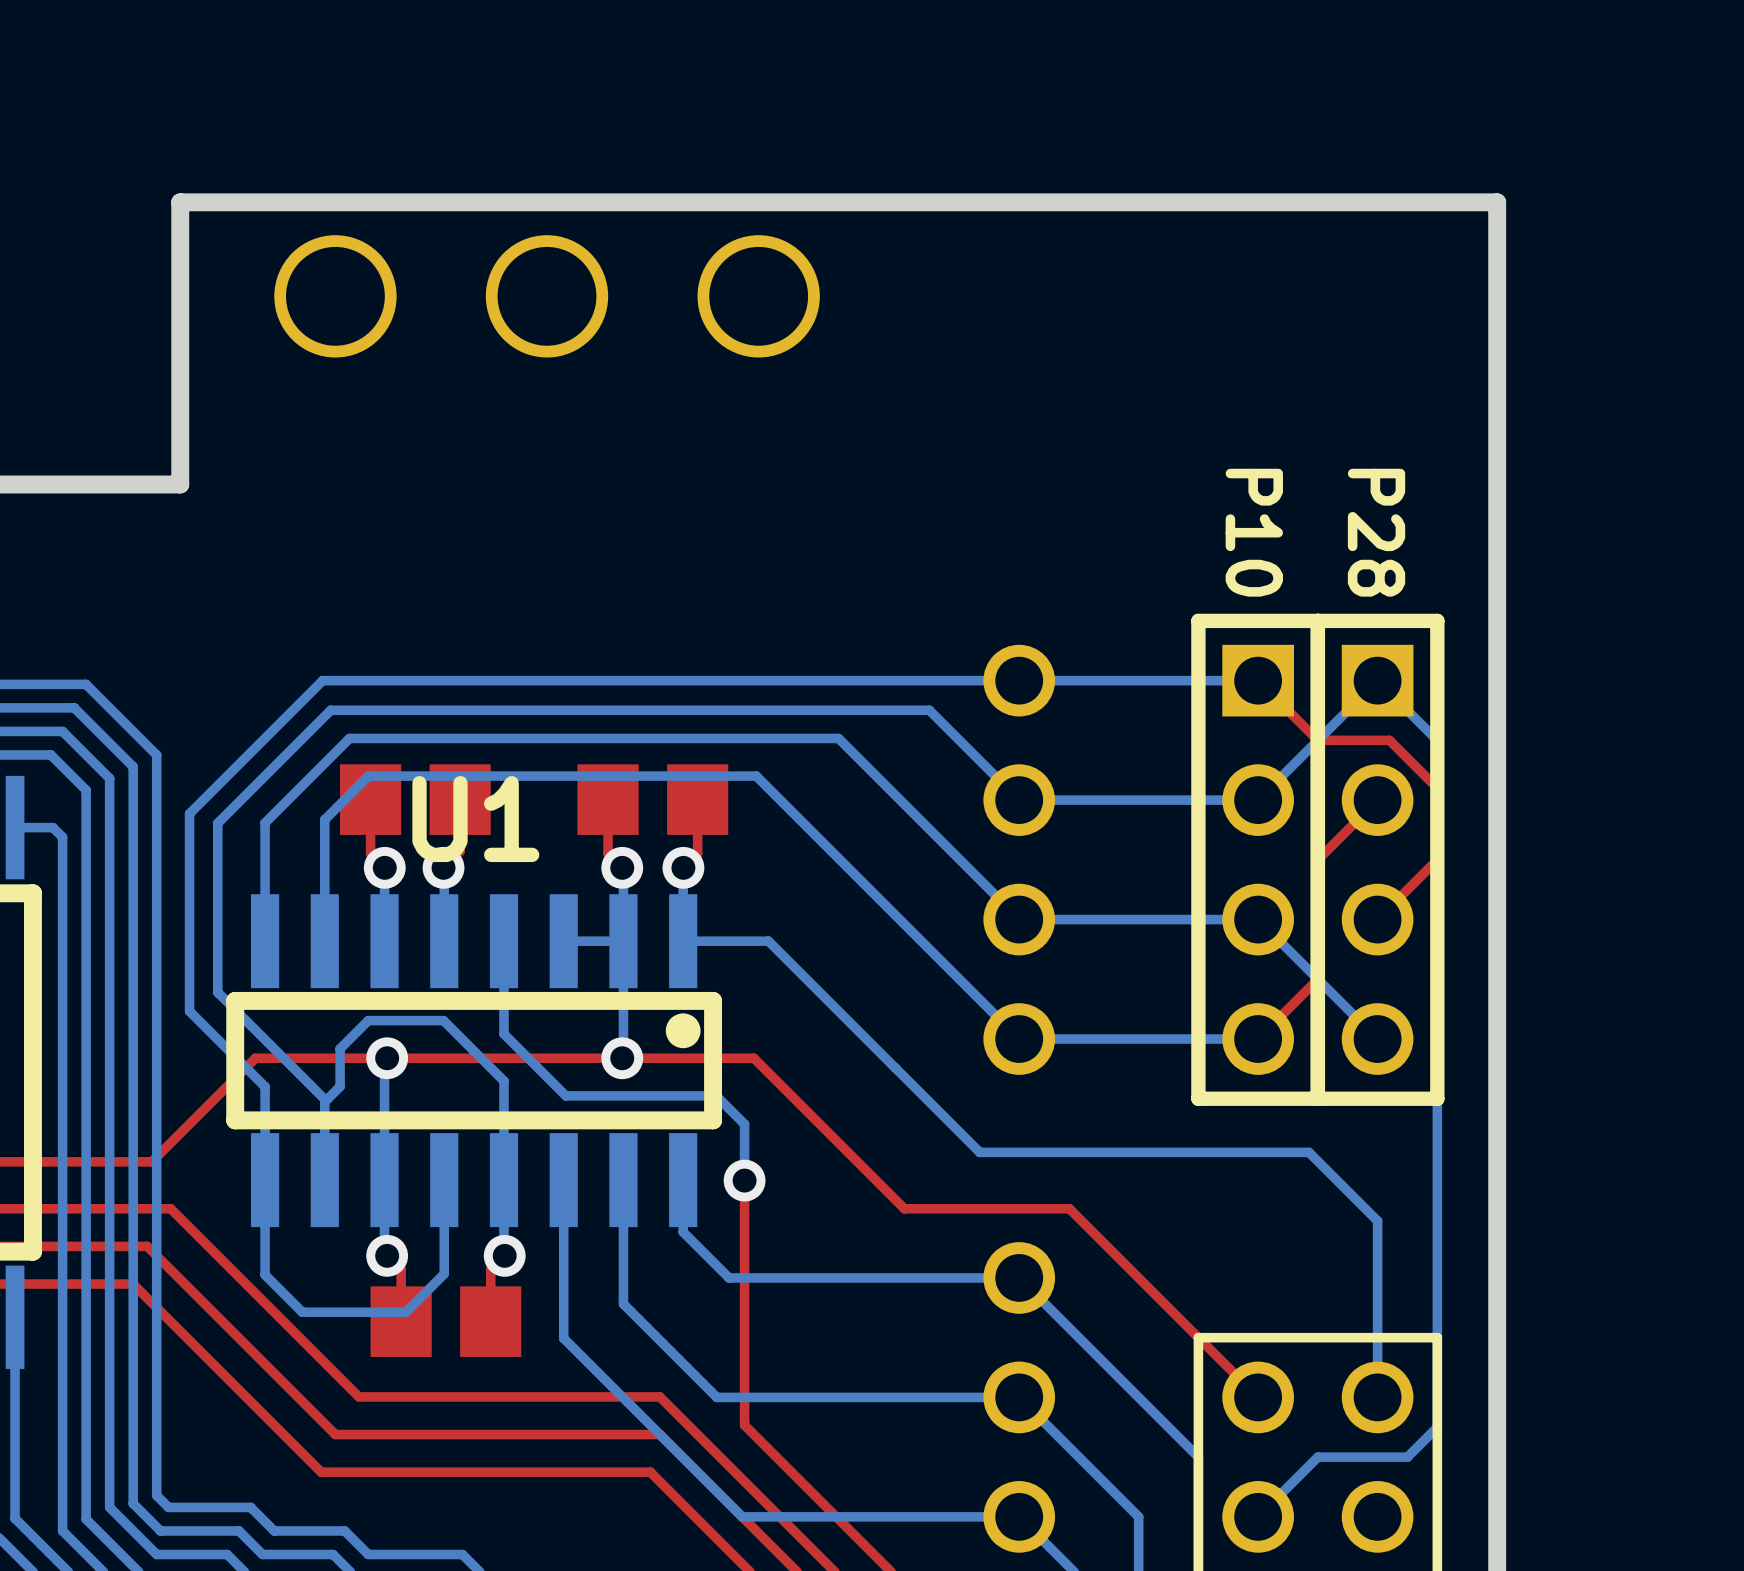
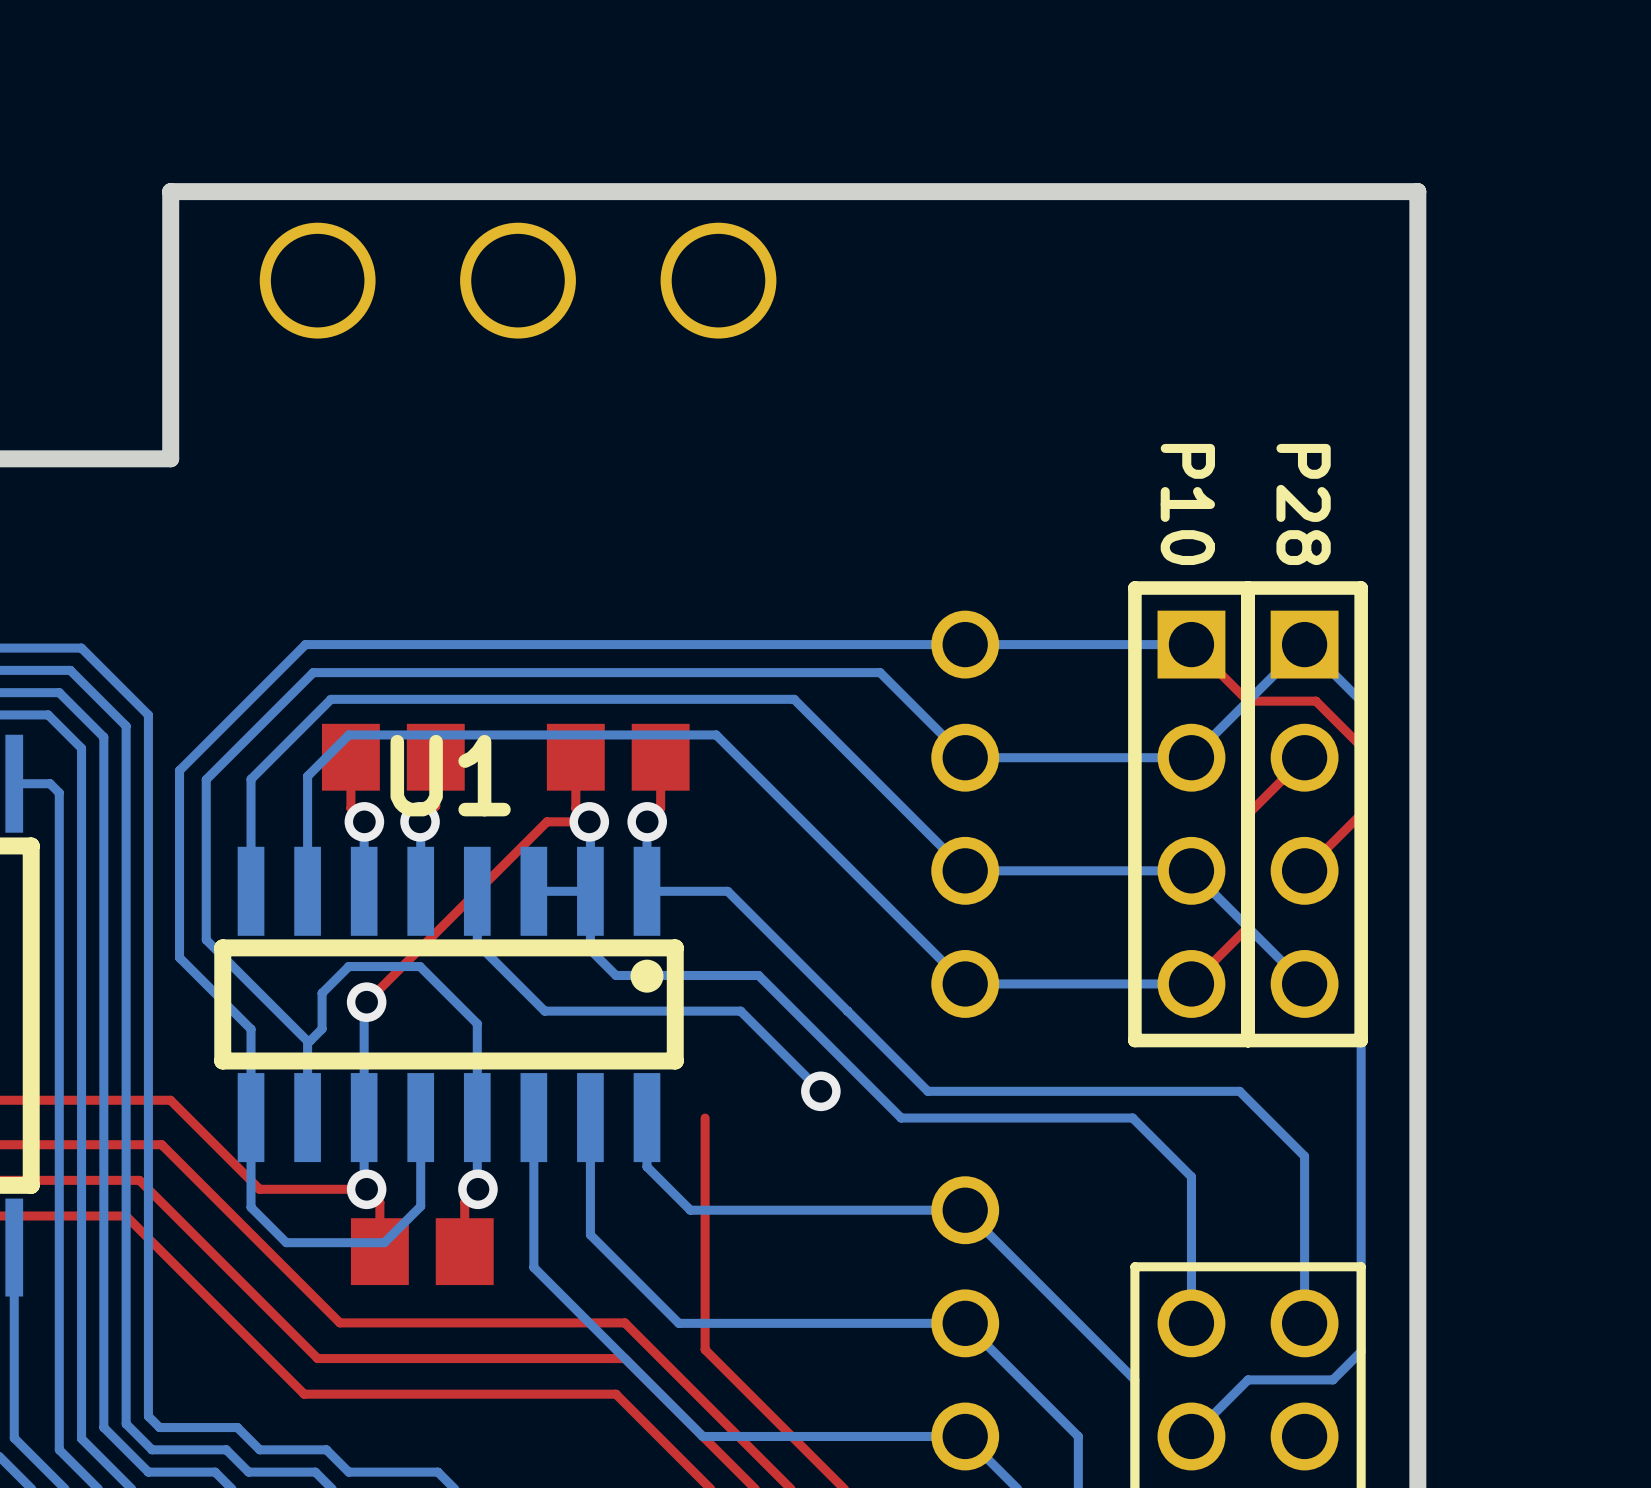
top track: none -> (589, 821) (546, 821) (366, 1002)
bottom track: (503, 996) (503, 1034) (565, 1095) (716, 1095) (744, 1124) (744, 1180) -> (477, 943) (544, 1011) (740, 1011) (820, 1091)
bottom track: (623, 1003) (622, 1058) -> (590, 949) (615, 975) (758, 975) (901, 1118) (1132, 1118) (1191, 1176) (1191, 1323)
via: (622, 1058) -> none
top track: (151, 1161) (255, 1058) (753, 1058) (904, 1208) (1069, 1208) (1258, 1397) -> (143, 1100) (170, 1100) (259, 1189) (366, 1189)
via position: (744, 1180) -> (820, 1091)

